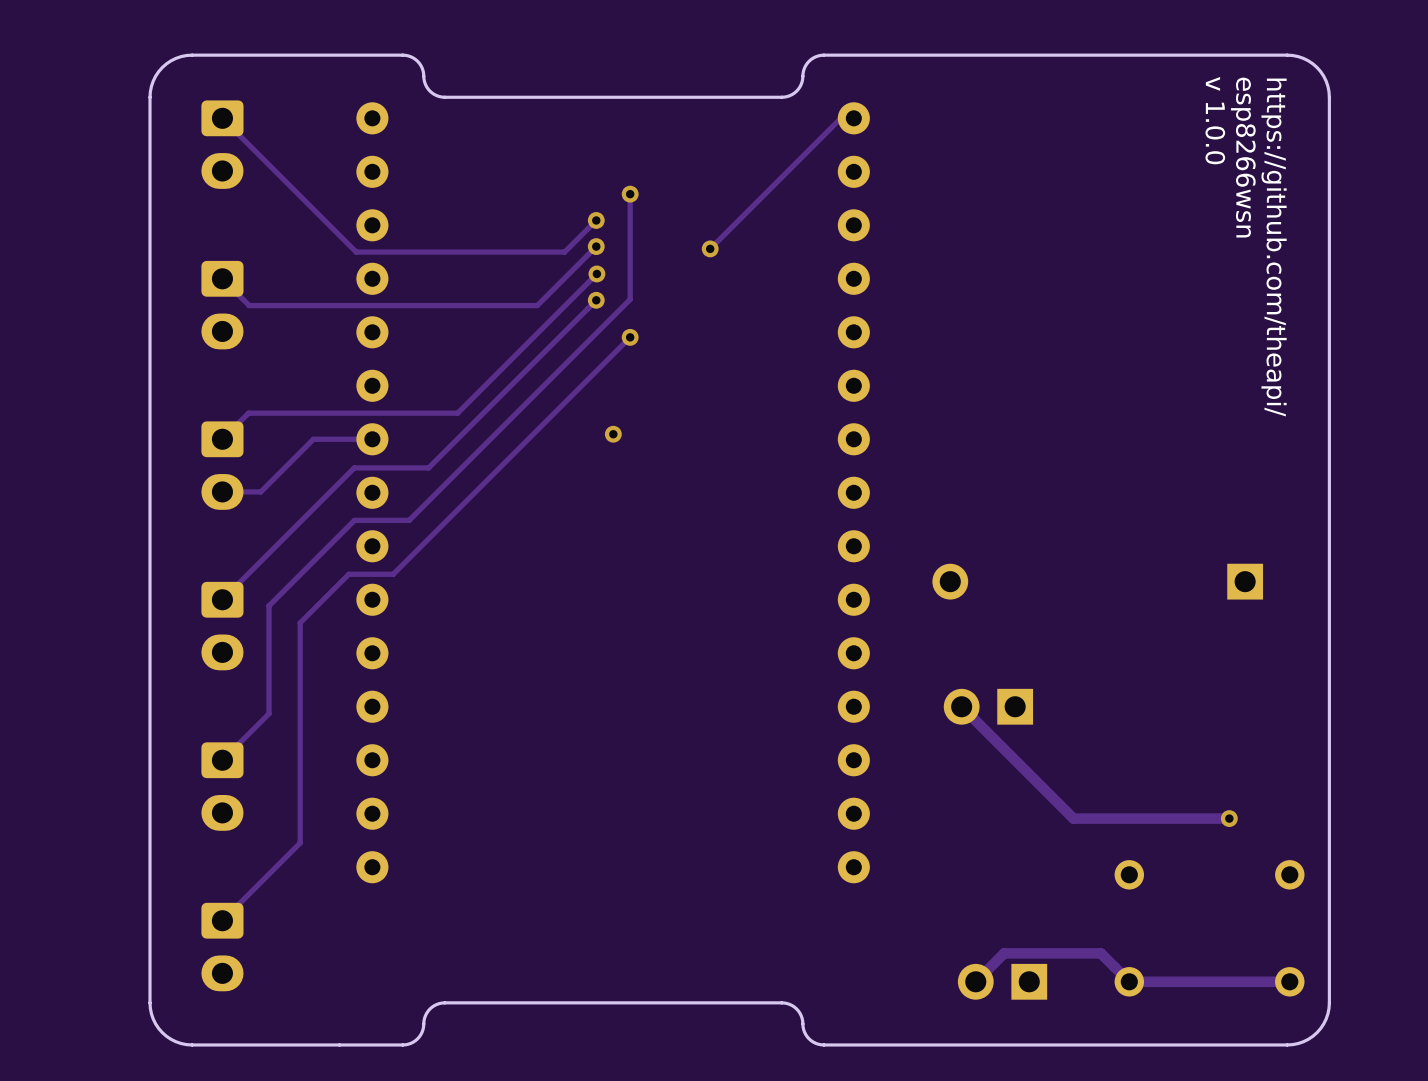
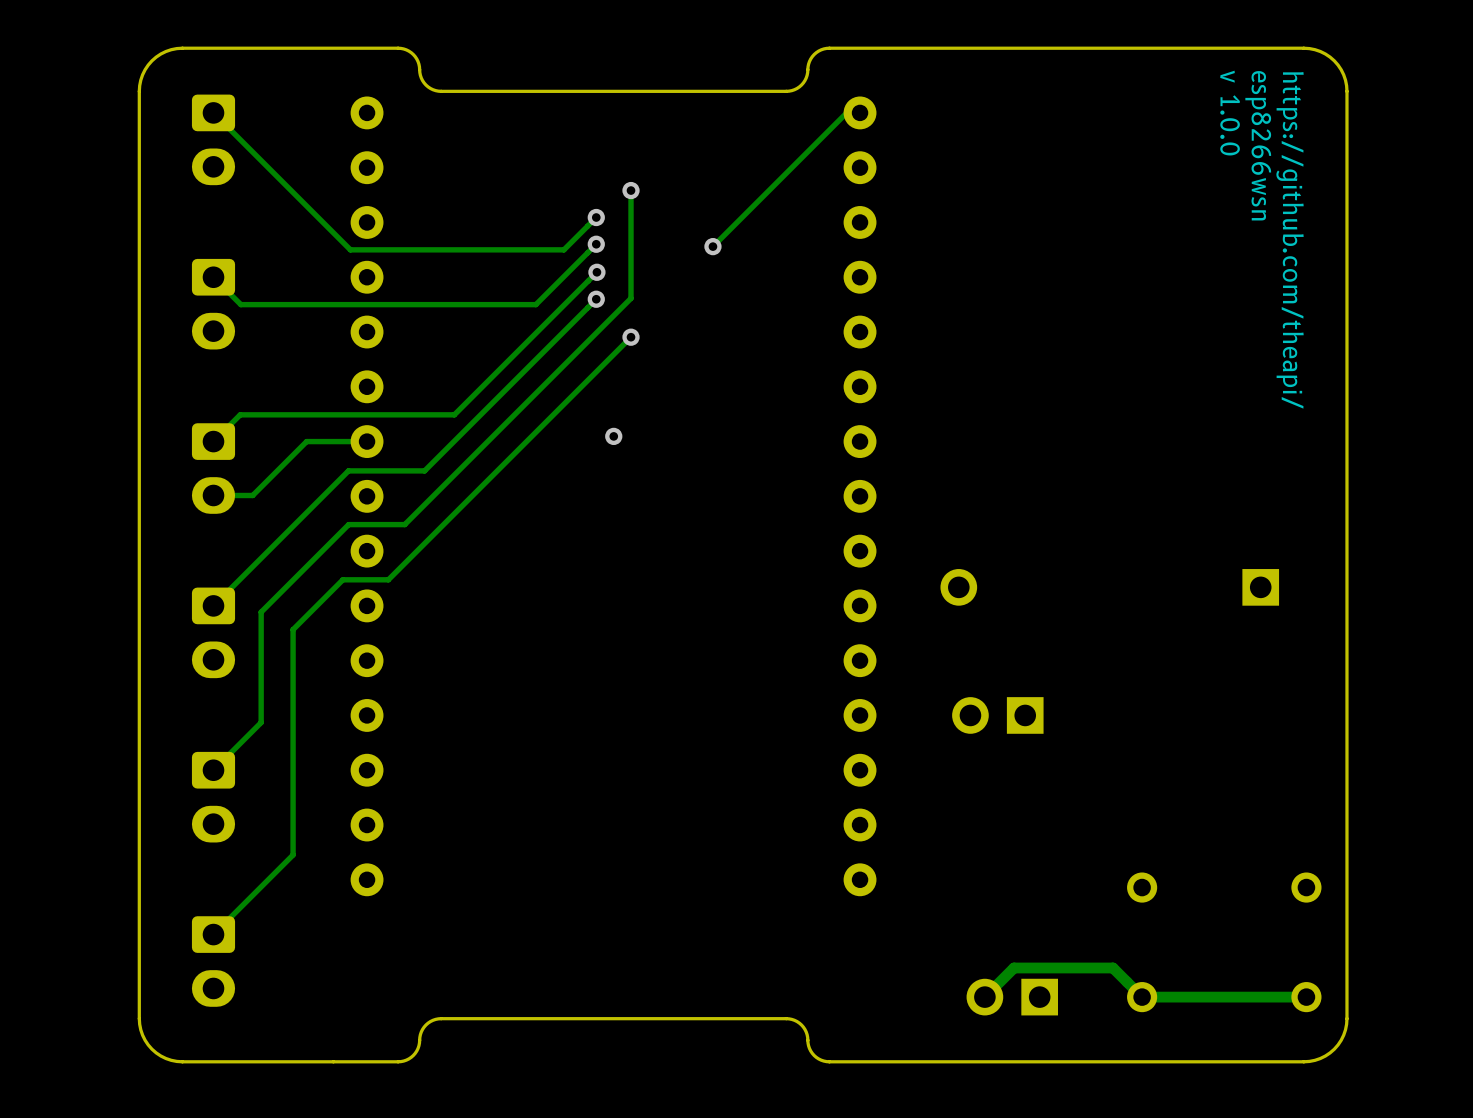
track: (961, 706) (1073, 818) (1229, 818) -> none
via: (1229, 818) -> none

